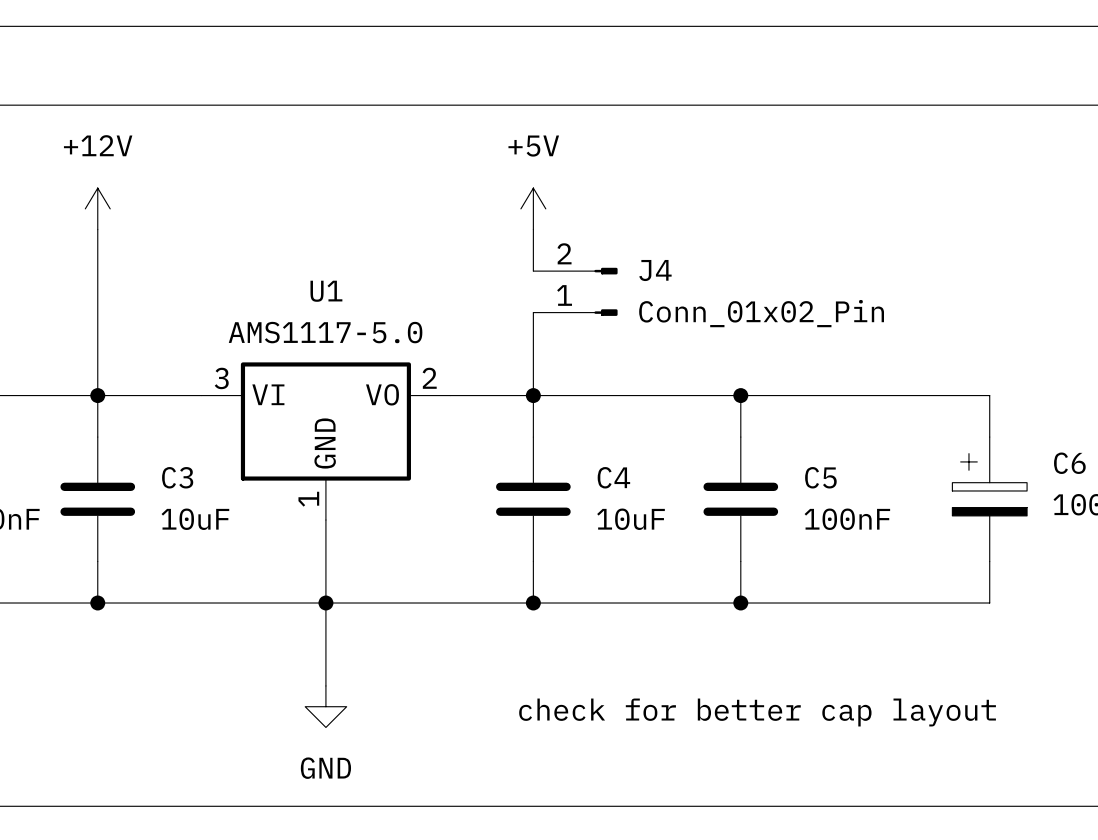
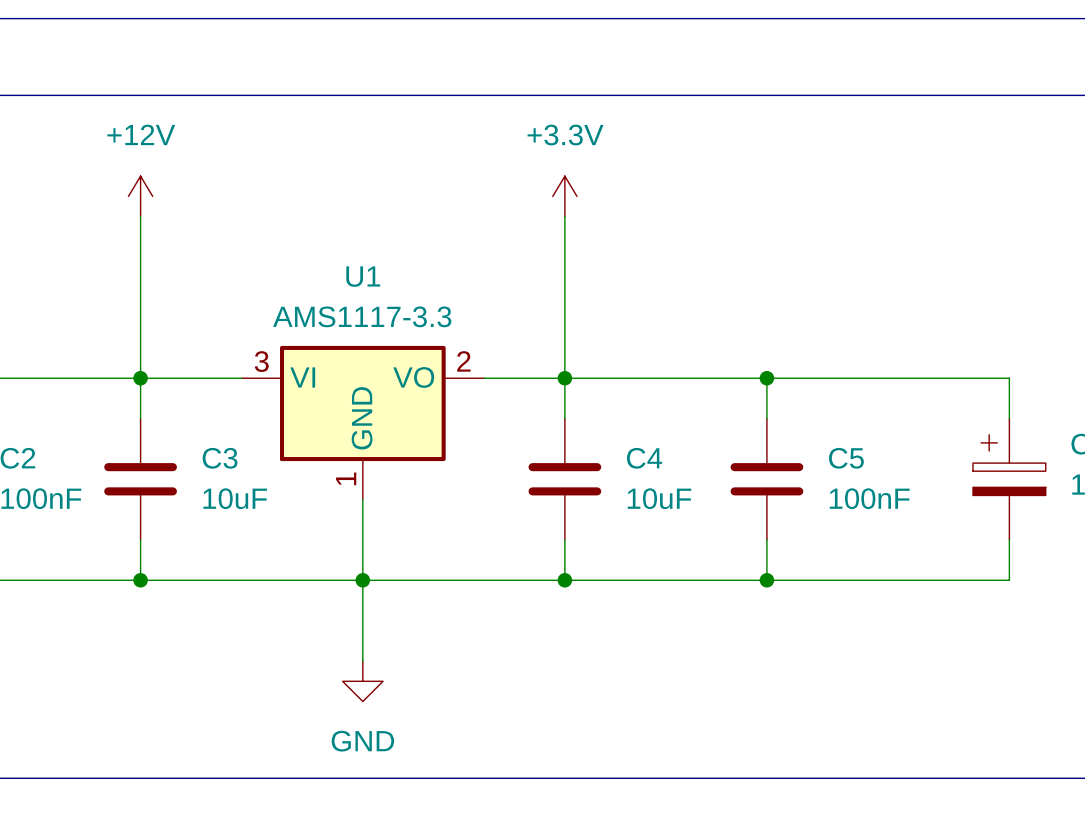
power symbol: +5V (533, 208) -> +3.3V (564, 196)
wire: none -> (564, 257) (564, 297)
J4: Conn_01x02_Pin (575, 291) -> none
U1 value: AMS1117-5.0 (325, 332) -> AMS1117-3.3 (362, 316)
text: check for better cap layout (757, 712) -> none

